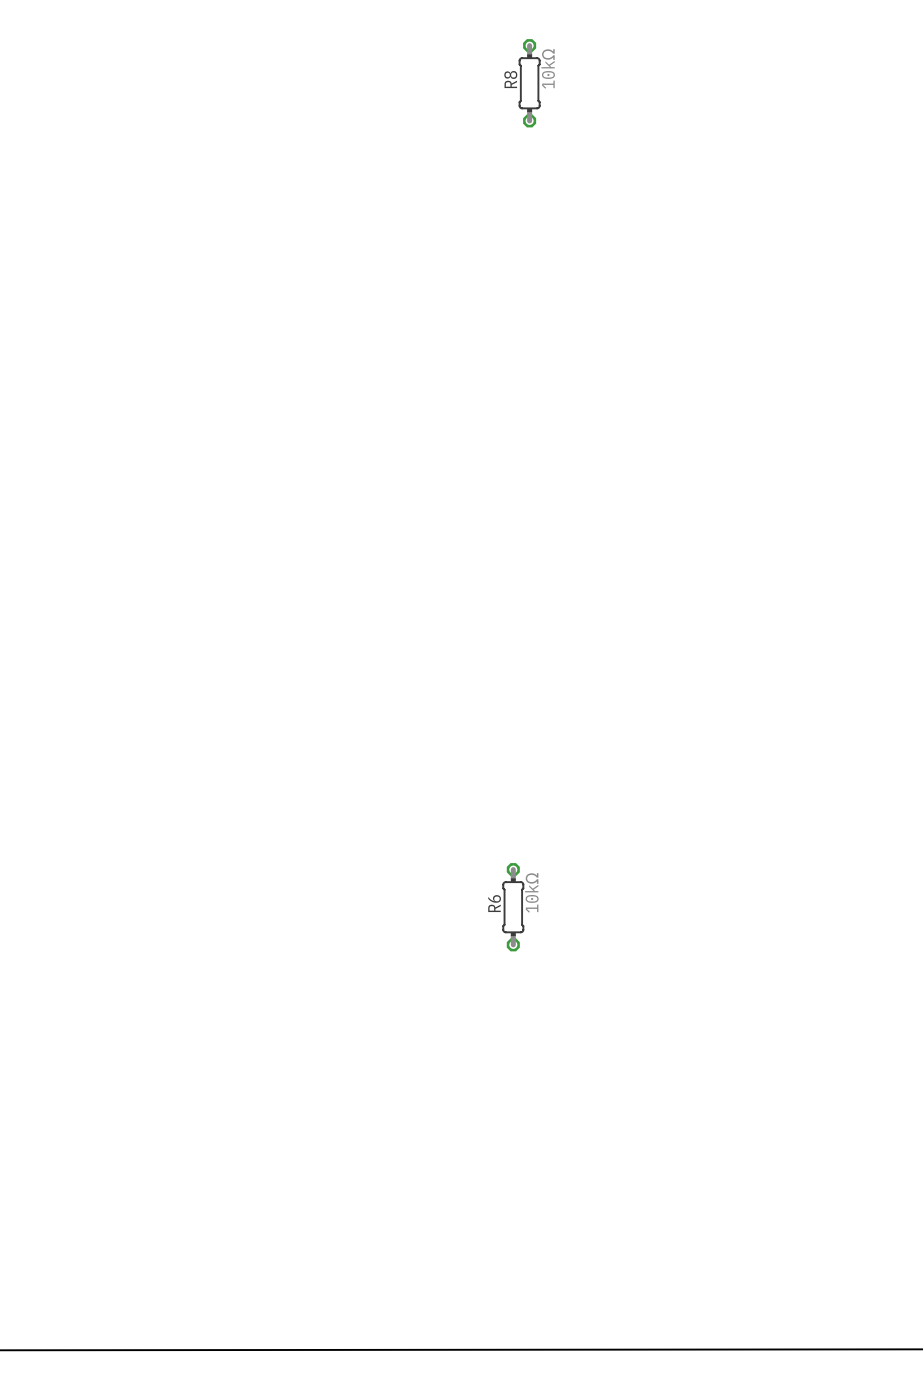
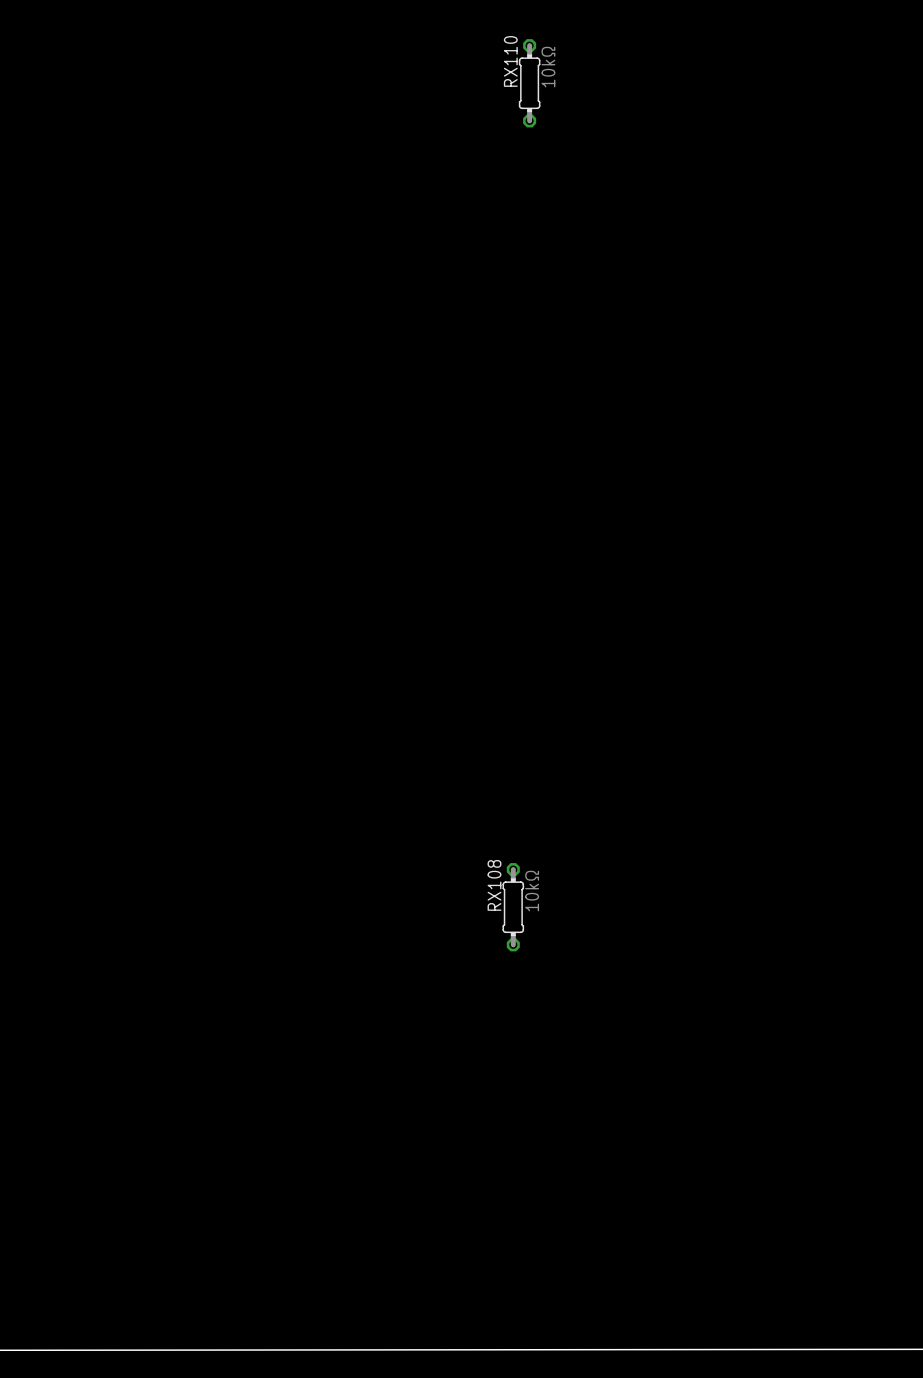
R8 name: R8 (510, 79) -> RX110 (510, 61)
R6 name: R6 (494, 903) -> RX108 (494, 885)

